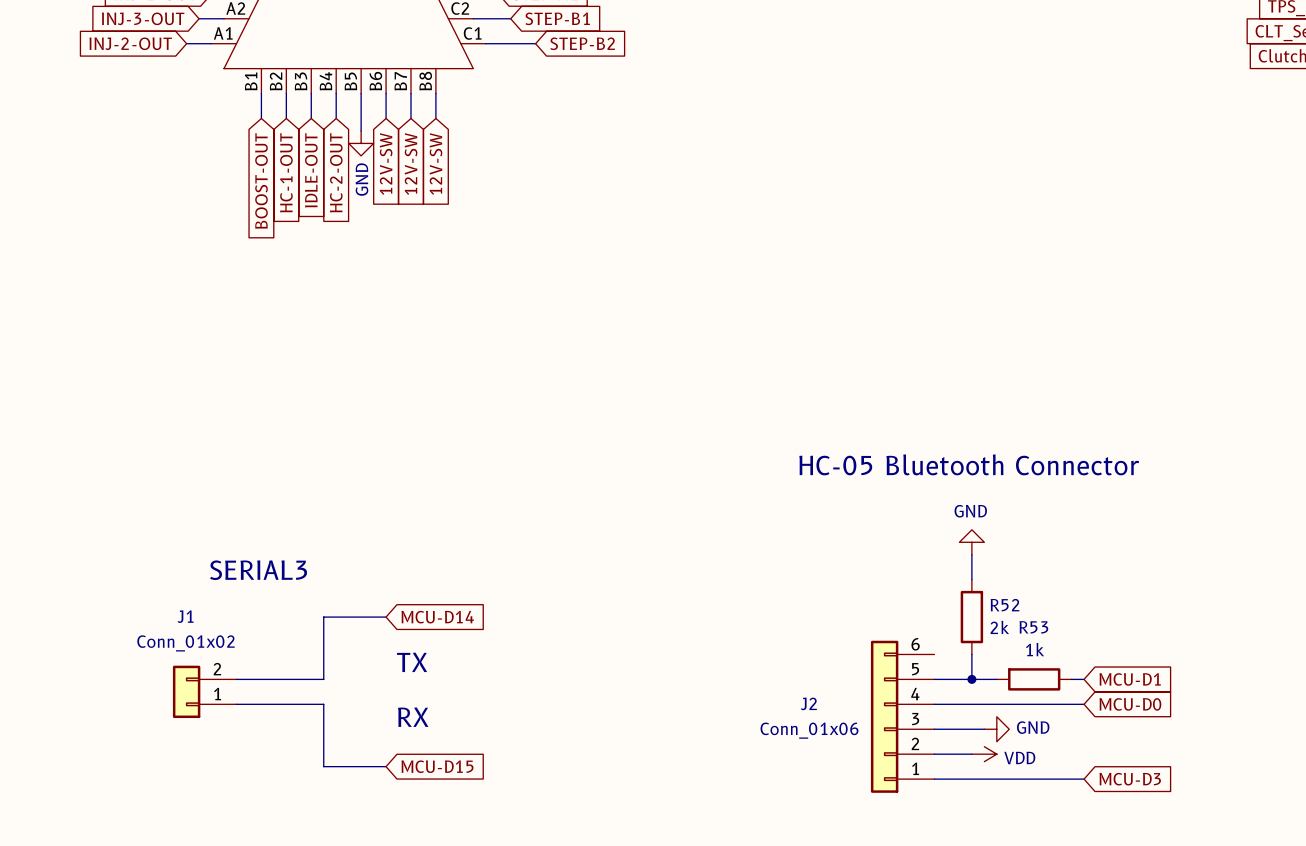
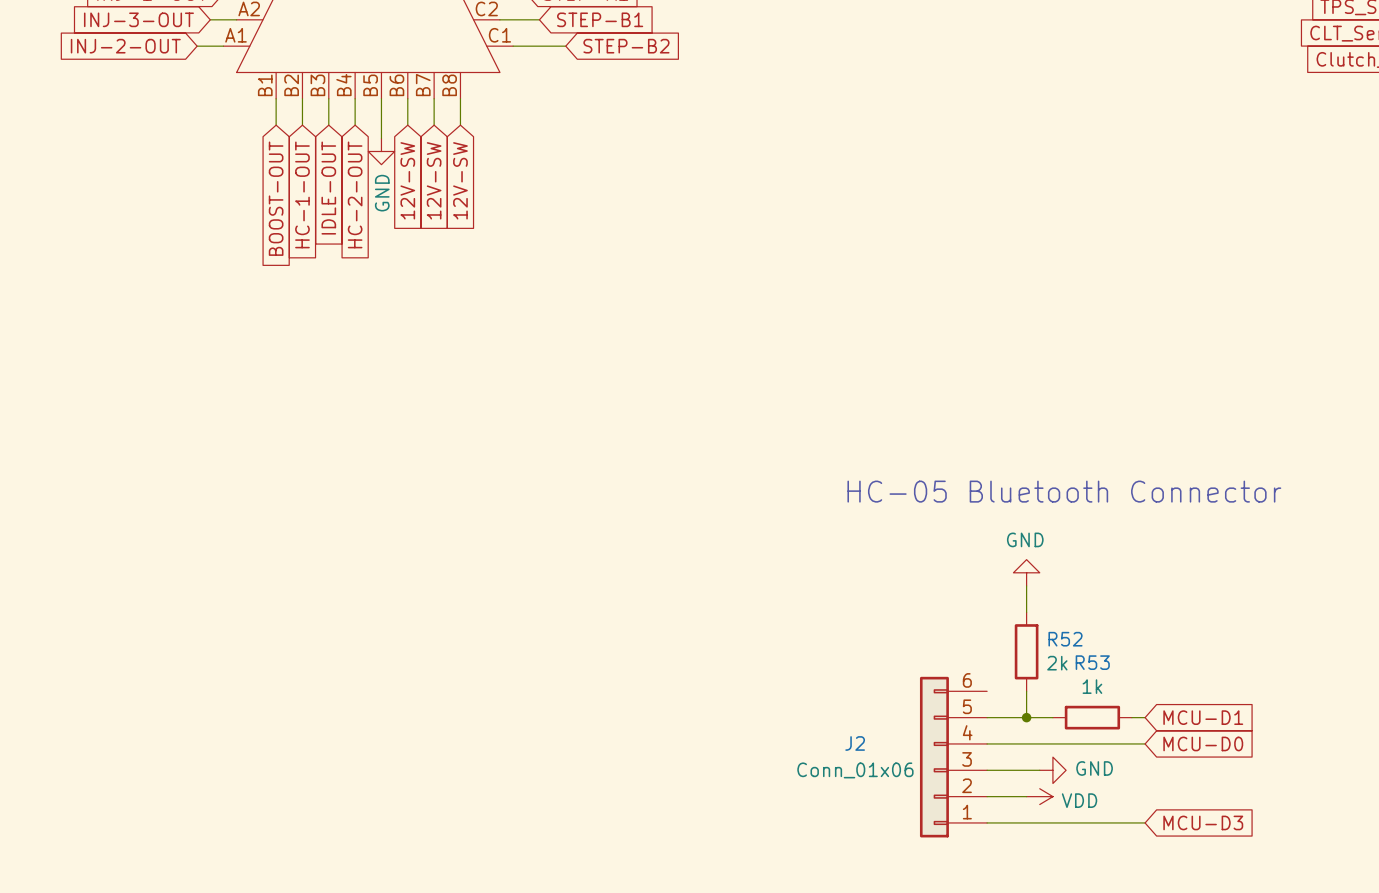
text: SERIAL3 (258, 570) -> none
wire: (386, 617) (323, 617) (323, 679) (236, 679) -> none
global label: MCU-D14 (437, 617) -> none
text: TX (412, 662) -> none
J1: Conn_01x02 (204, 691) -> none
wire: (236, 704) (323, 704) (323, 766) (386, 766) -> none
text: RX (413, 717) -> none
global label: MCU-D15 (437, 766) -> none

